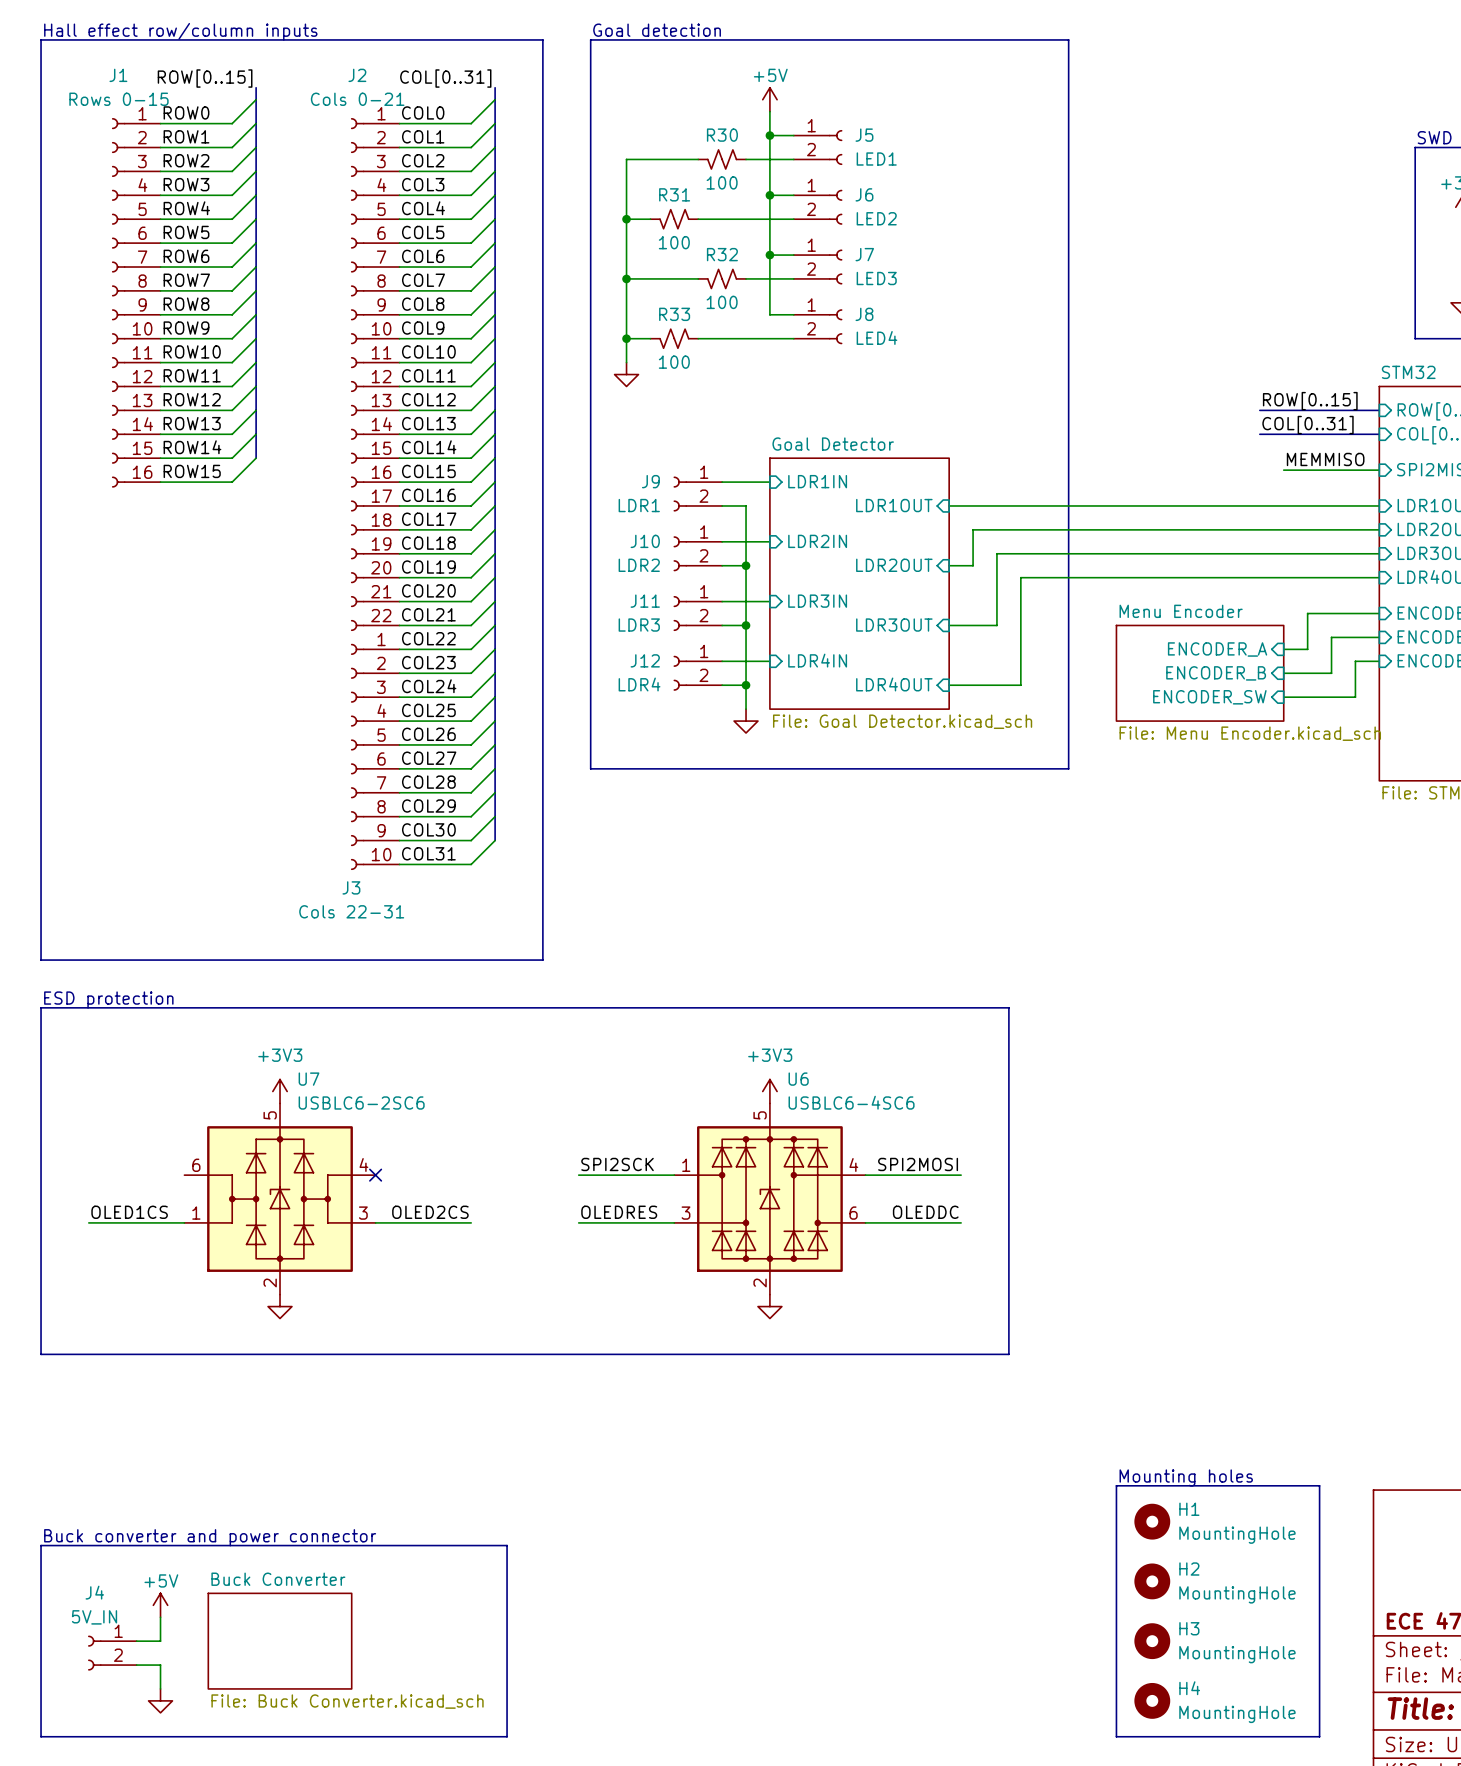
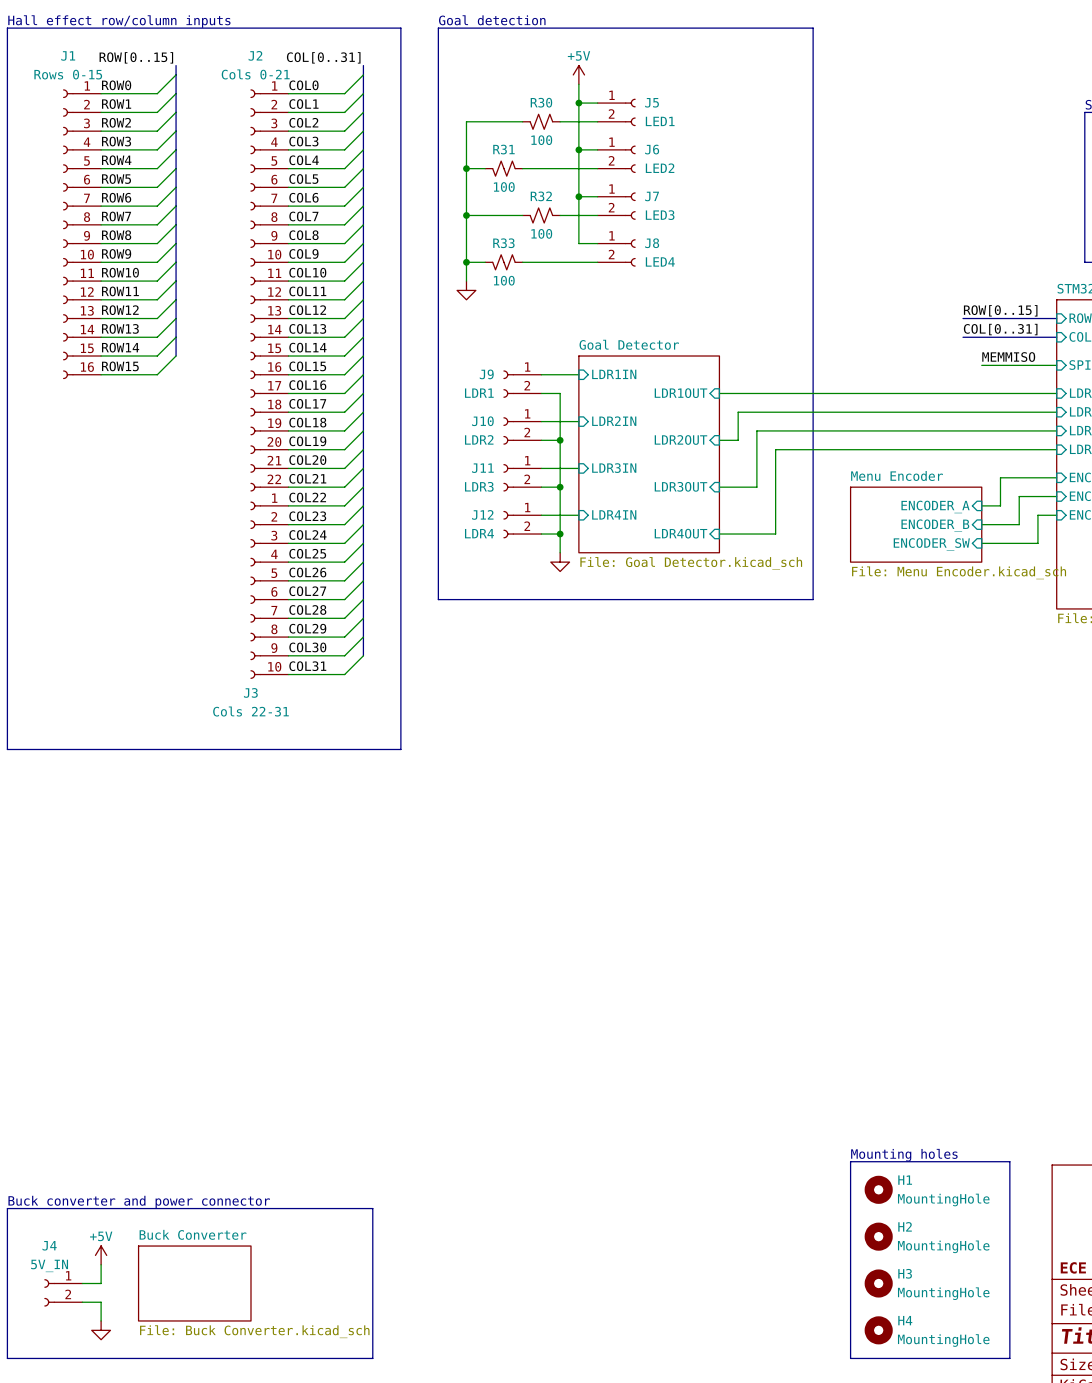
text: ESD protection (108, 1000) -> none
line: (41, 1007) (1008, 1007) (1008, 1354) (41, 1354) (41, 1007) -> none
power symbol: +3V3 (280, 1091) -> none
power symbol: +3V3 (769, 1091) -> none
label: SPI2SCK (617, 1164) -> none
label: SPI2MOSI (918, 1164) -> none
no-connect mark: (375, 1175) -> none
wire: (578, 1175) (674, 1175) -> none
wire: (865, 1175) (961, 1175) -> none
U7: USBLC6-2SC6 (280, 1199) -> none
U6: USBLC6-4SC6 (769, 1199) -> none
label: OLED1CS (129, 1212) -> none
label: OLED2CS (430, 1212) -> none
label: OLEDRES (619, 1212) -> none
label: OLEDDC (925, 1212) -> none
wire: (88, 1222) (184, 1222) -> none
wire: (375, 1222) (471, 1222) -> none
wire: (578, 1222) (674, 1222) -> none
wire: (865, 1222) (961, 1222) -> none
power symbol: (280, 1306) -> none
power symbol: (769, 1306) -> none

